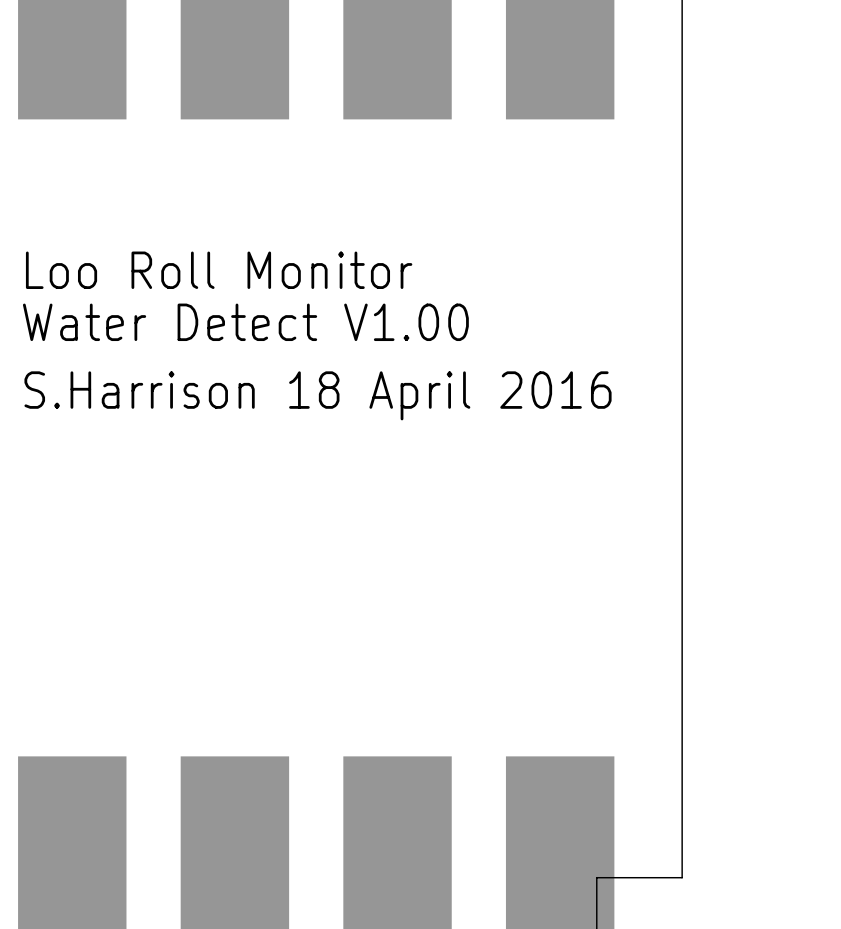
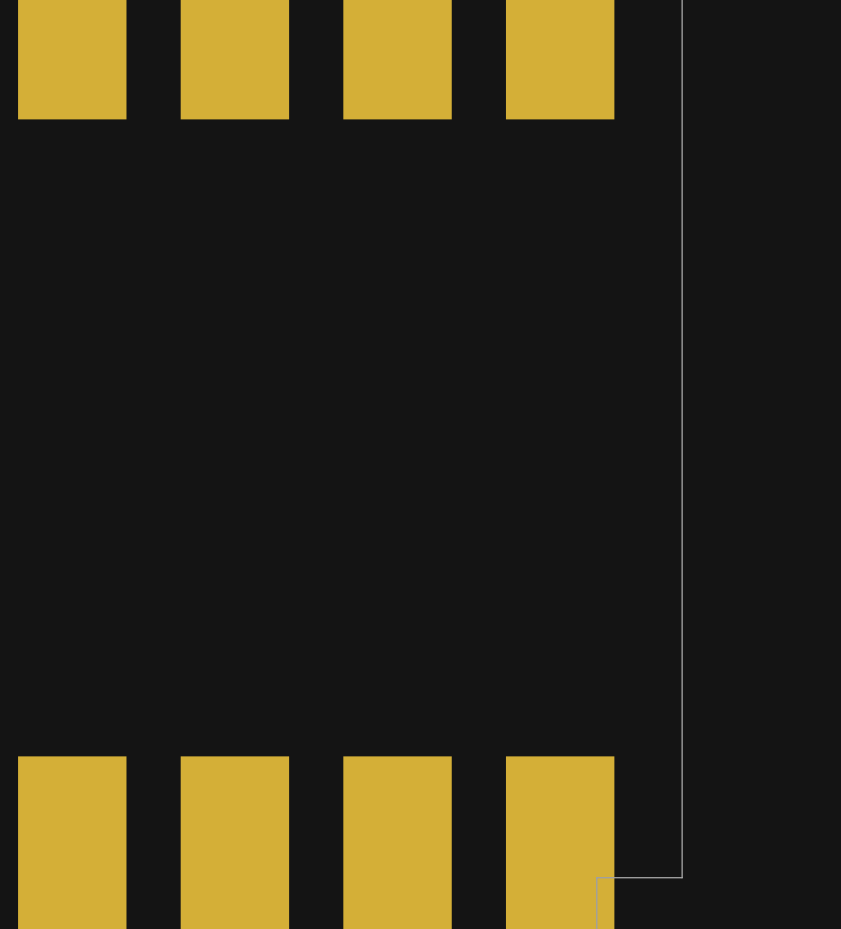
text: Loo Roll Monitor (219, 270) -> none
text: Water Detect V1.00 (245, 322) -> none
text: S.Harrison 18 April 2016 (318, 395) -> none

